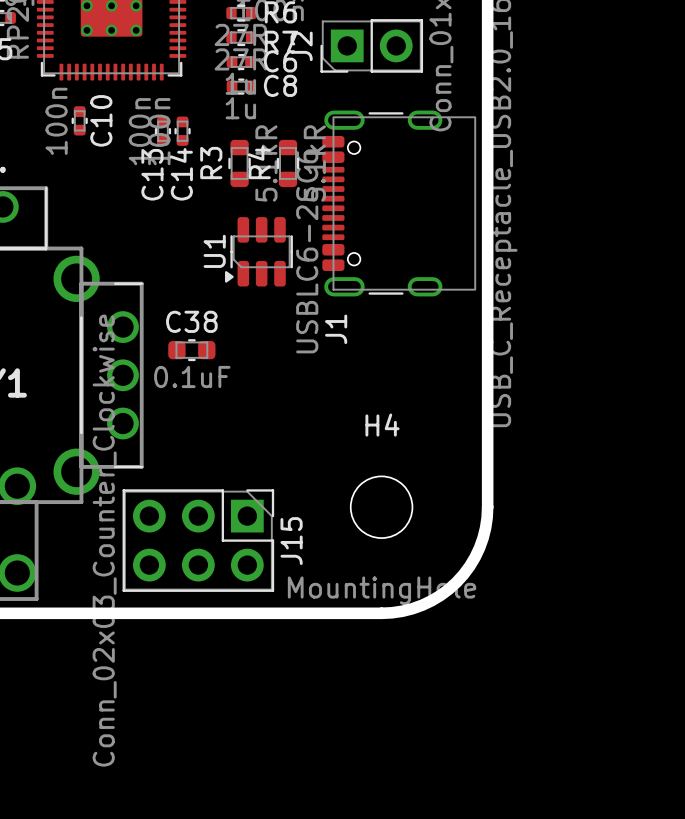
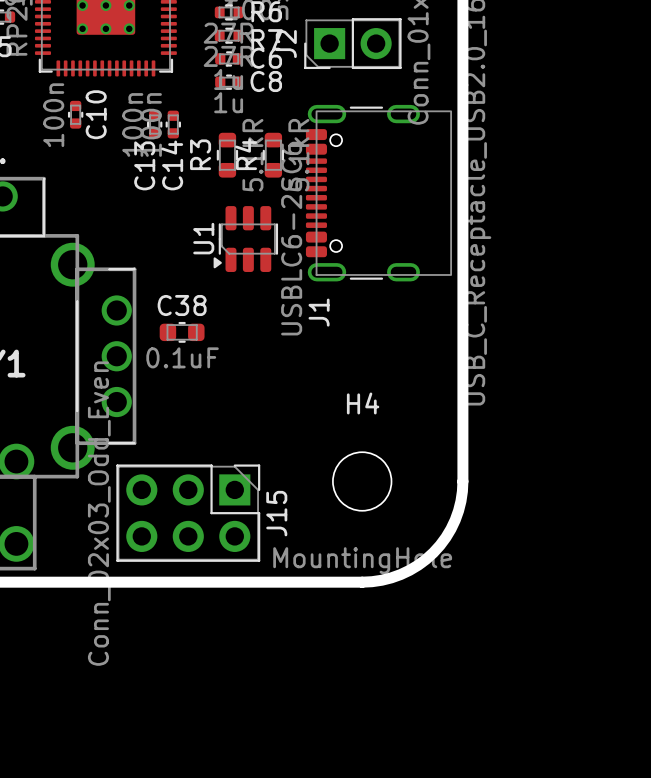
J15 value: Conn_02x03_Counter_Clockwise (104, 540) -> Conn_02x03_Odd_Even (99, 513)

